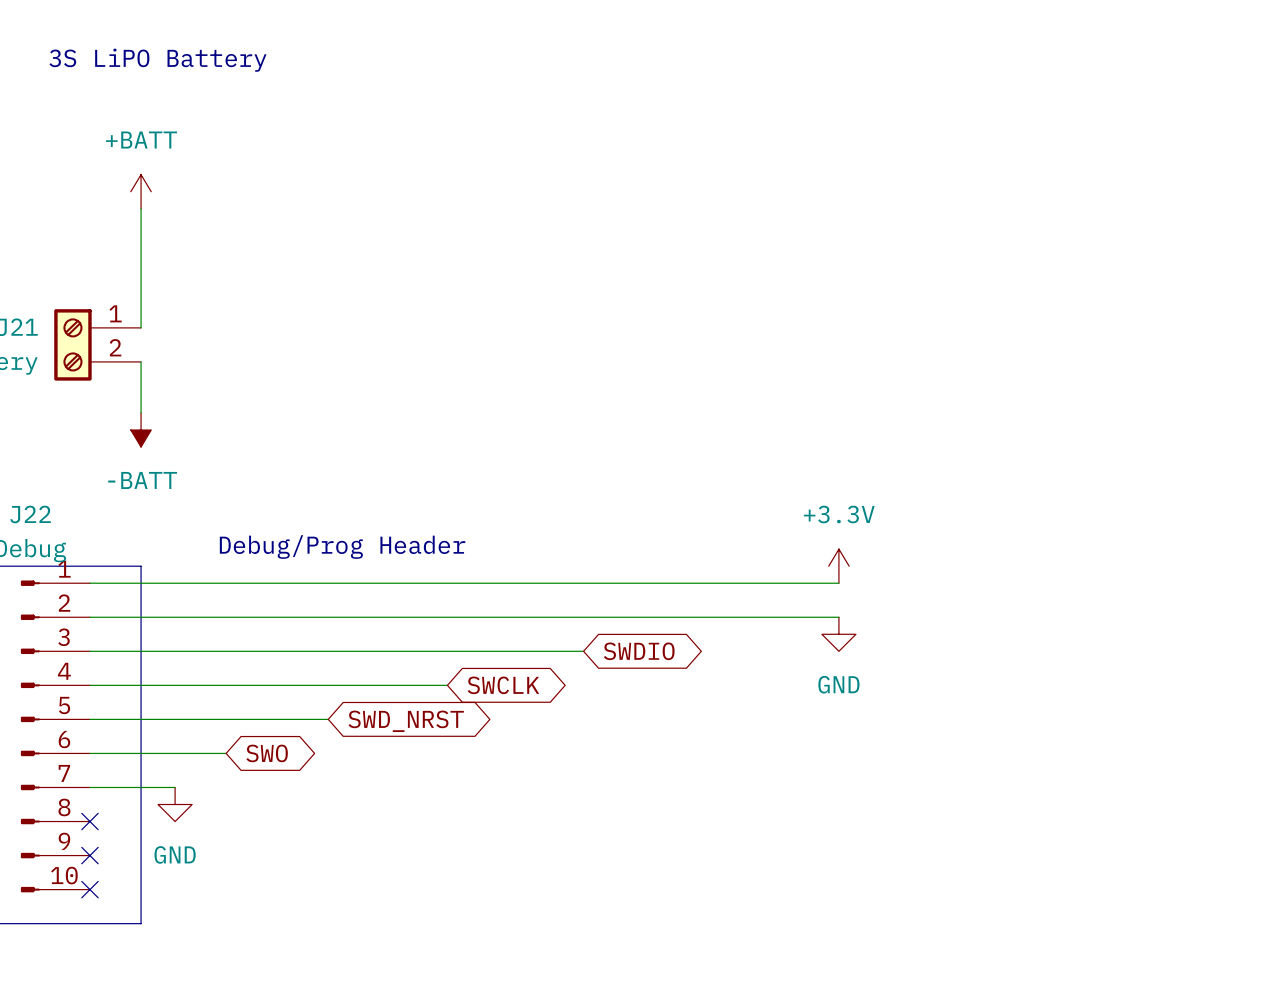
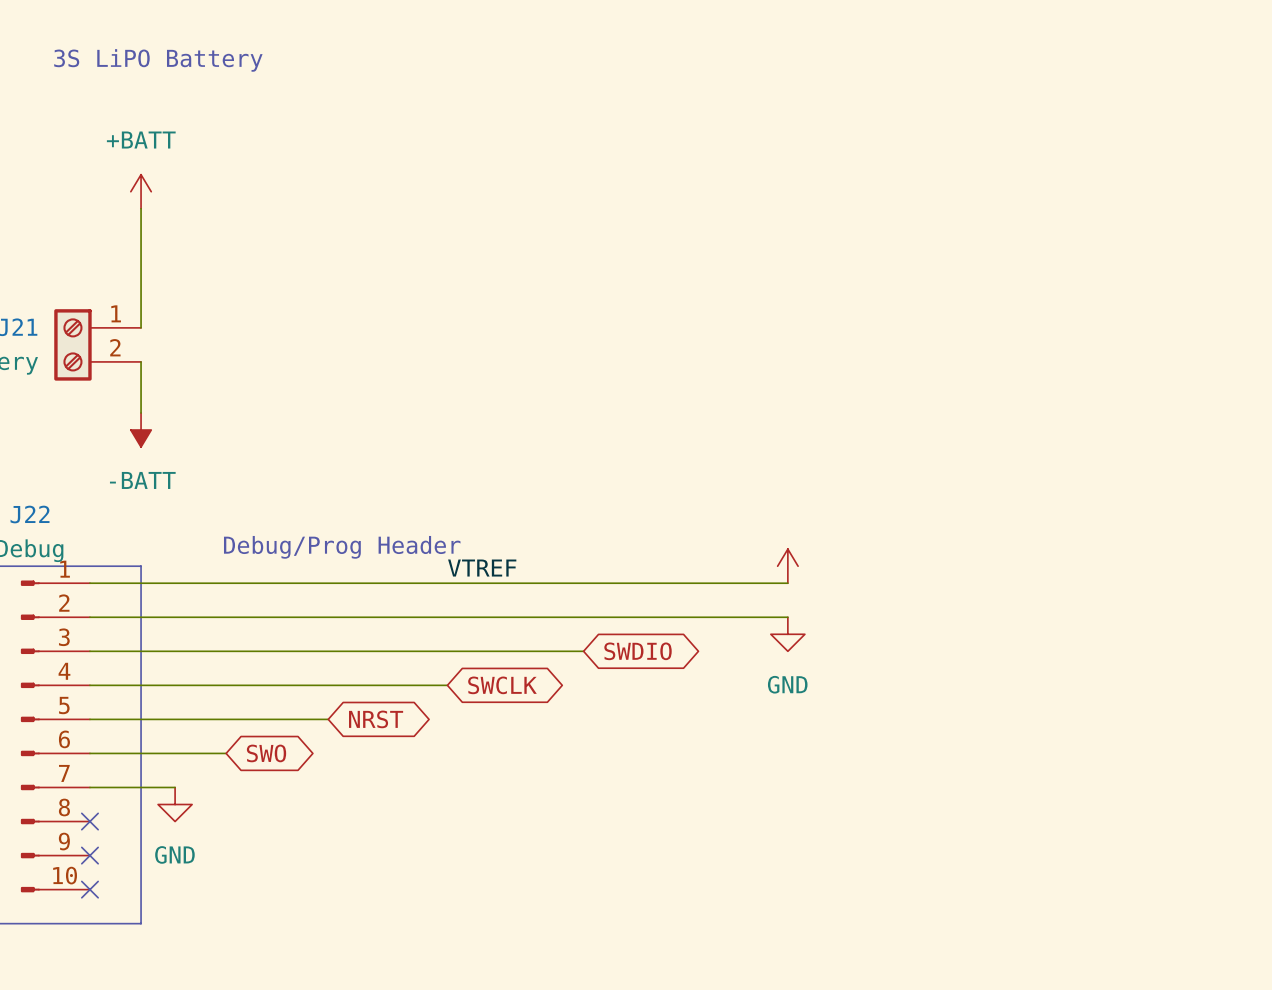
power symbol: none -> (787, 566)
power symbol: +3.3V (838, 566) -> none
label: none -> VTREF (482, 568)
wire: (787, 583) (838, 583) -> none
wire: (787, 617) (838, 617) -> none
power symbol position: GND (838, 634) -> GND (787, 634)
global label: SWD_NRST (406, 721) -> NRST (376, 719)

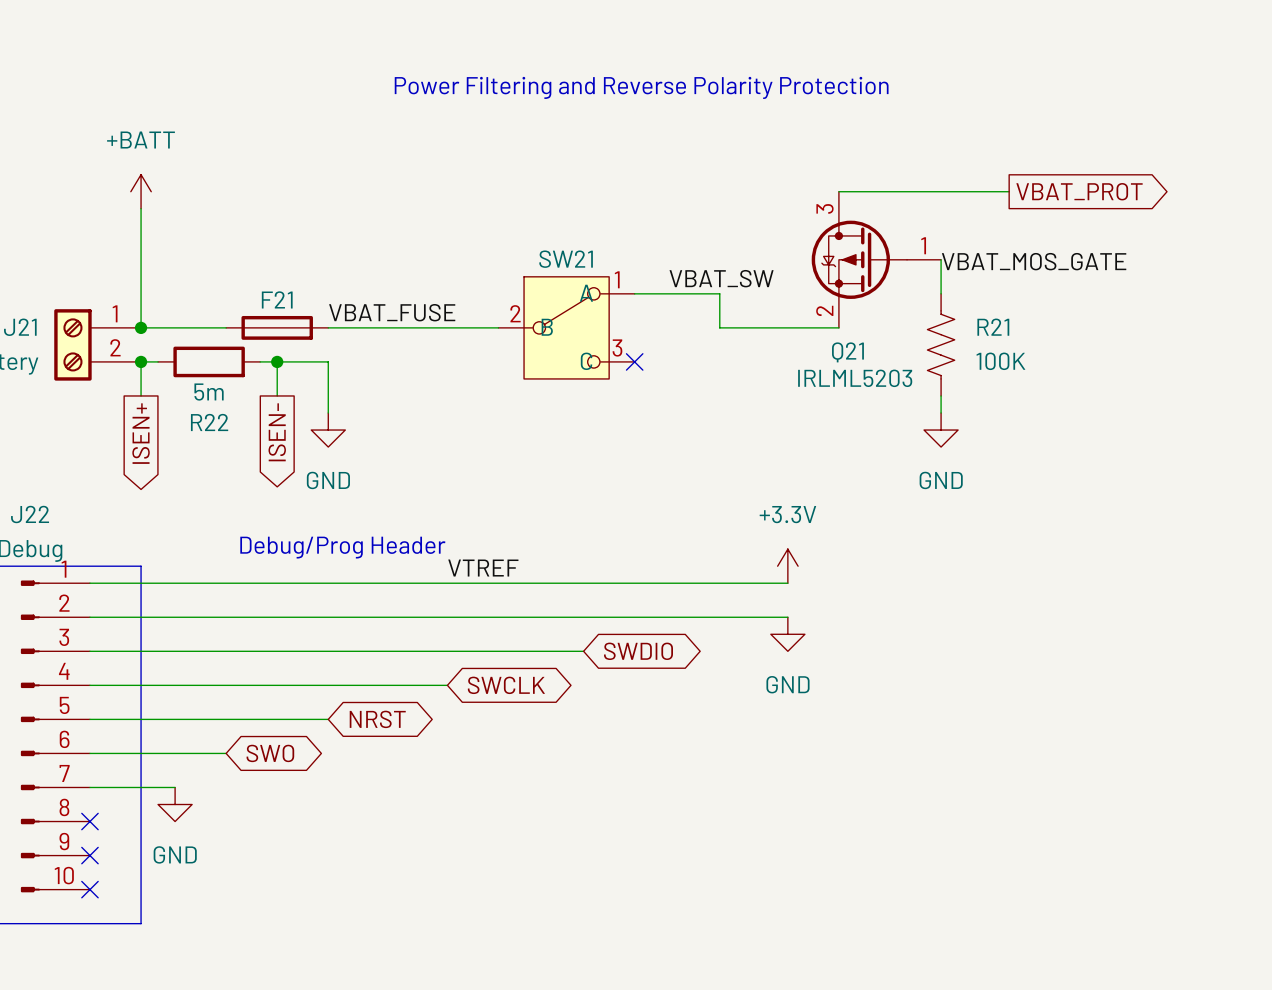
text: 3S LiPO Battery (158, 60) -> none
text: none -> Power Filtering and Reverse Polarity Protection (641, 87)
wire: none -> (838, 191) (1009, 191)
global label: none -> VBAT_PROT (1079, 191)
Q21: none -> IRLML5203 (876, 259)
wire: none -> (941, 259) (941, 293)
label: none -> VBAT_MOS_GATE (1034, 261)
label: none -> VBAT_SW (721, 278)
wire: none -> (634, 293) (719, 293) (719, 327) (838, 327)
label: none -> VBAT_FUSE (392, 312)
wire: none -> (141, 327) (226, 327)
junction: none -> (141, 327)
F21: none -> (277, 327)
wire: none -> (328, 327) (498, 327)
SW21: none -> (566, 327)
R21: none -> 100K (941, 344)
wire: none -> (141, 361) (158, 361)
junction: none -> (141, 361)
R22: none -> 5m (209, 361)
wire: none -> (260, 361) (328, 361) (328, 413)
wire: none -> (277, 361) (277, 395)
junction: none -> (277, 361)
no-connect mark: none -> (634, 361)
wire: (141, 395) (141, 413) -> none
wire: none -> (941, 395) (941, 413)
power symbol: -BATT (141, 430) -> none
power symbol: none -> GND (328, 430)
power symbol: none -> GND (941, 430)
global label: none -> ISEN+ (141, 433)
global label: none -> ISEN- (277, 432)
power symbol text: none -> +3.3V (787, 514)

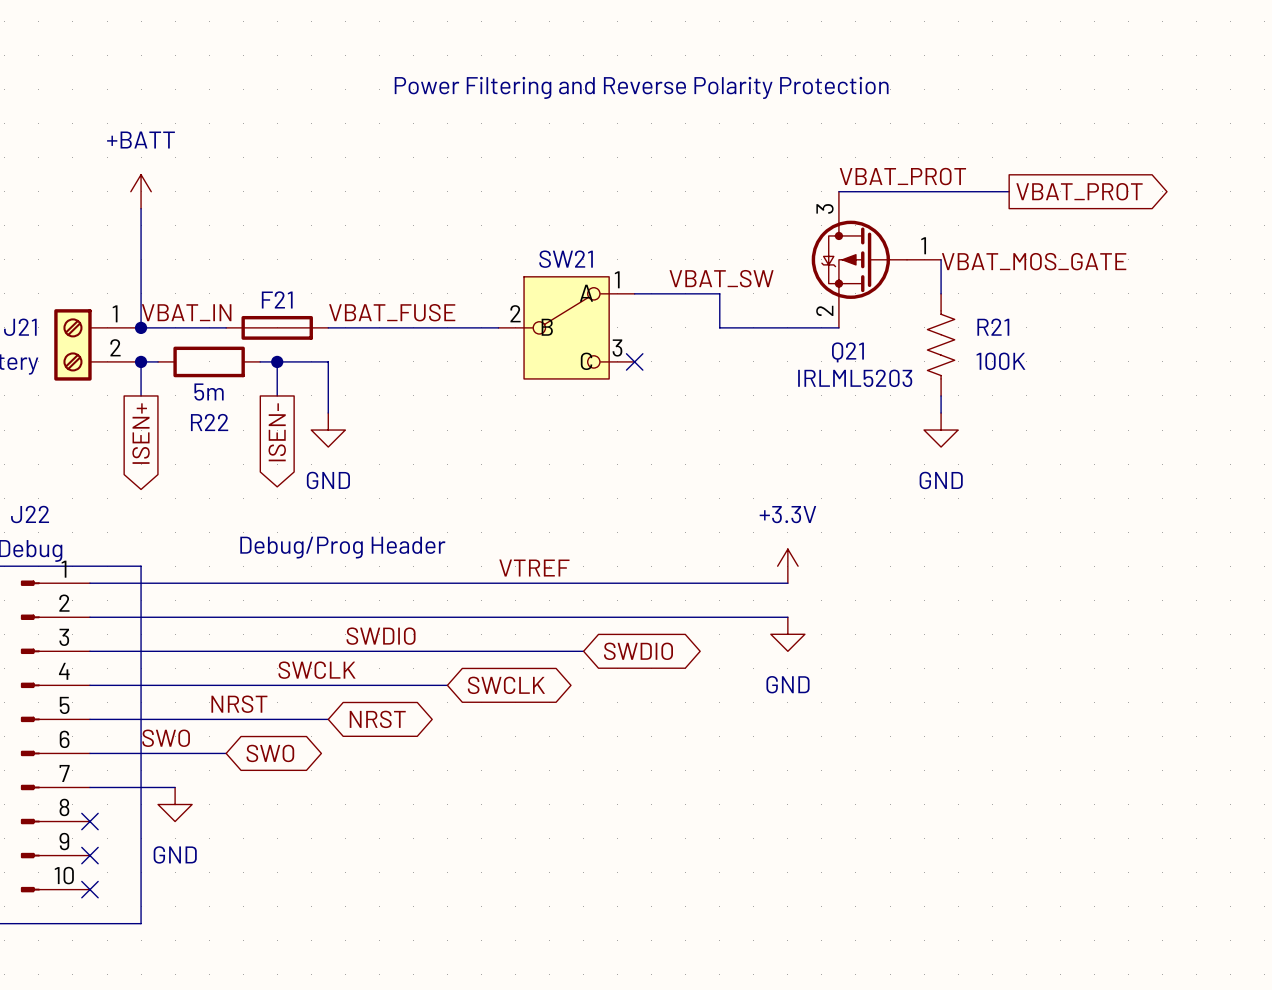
label: none -> VBAT_PROT (902, 176)
label: none -> VBAT_IN (186, 312)
label position: VTREF (483, 568) -> VTREF (534, 568)
label: none -> SWDIO (381, 636)
label: none -> SWCLK (317, 670)
label: none -> NRST (239, 704)
label: none -> SWO (166, 738)

